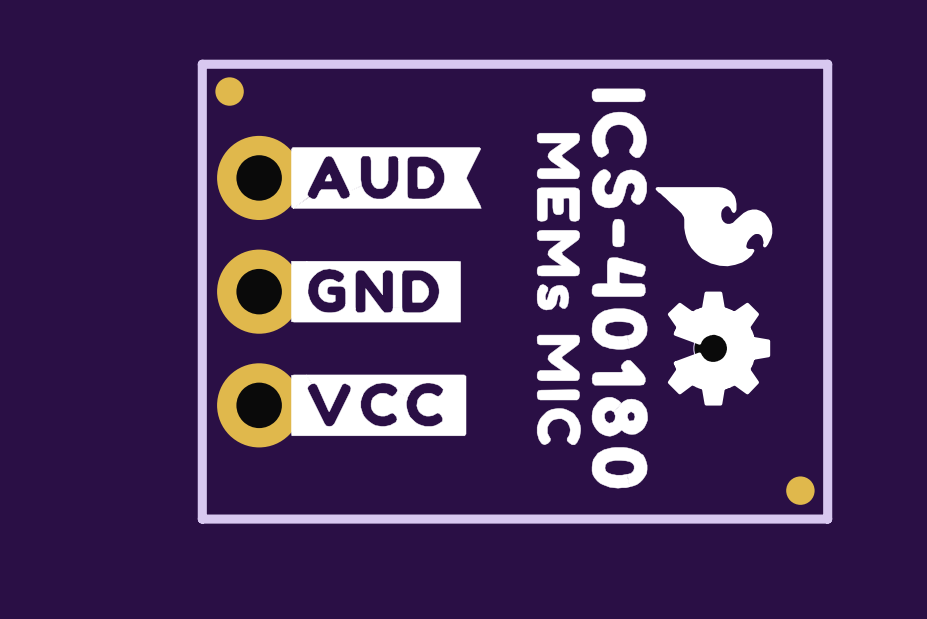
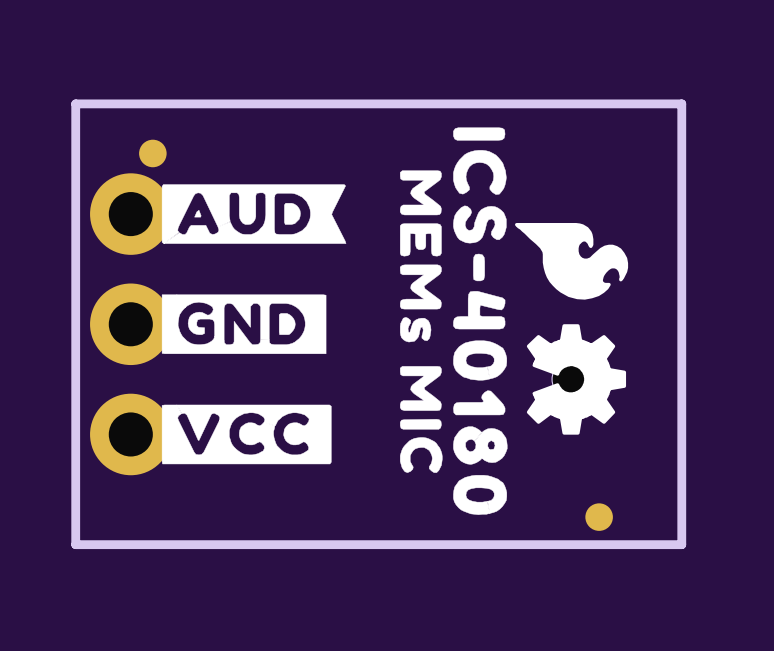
part position: (229, 91) -> (152, 153)
part position: (800, 490) -> (599, 517)

